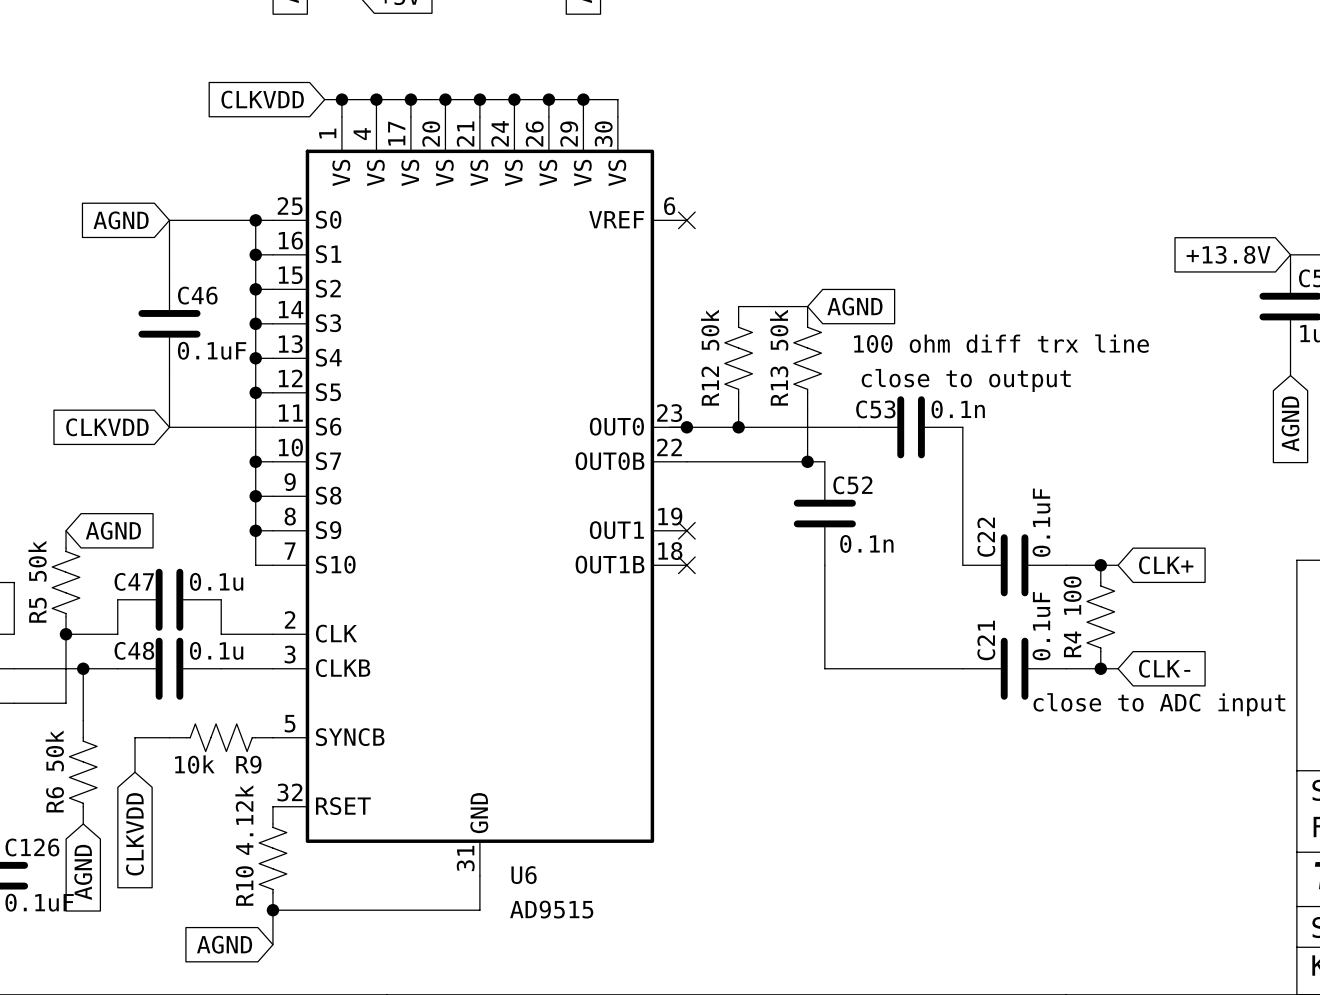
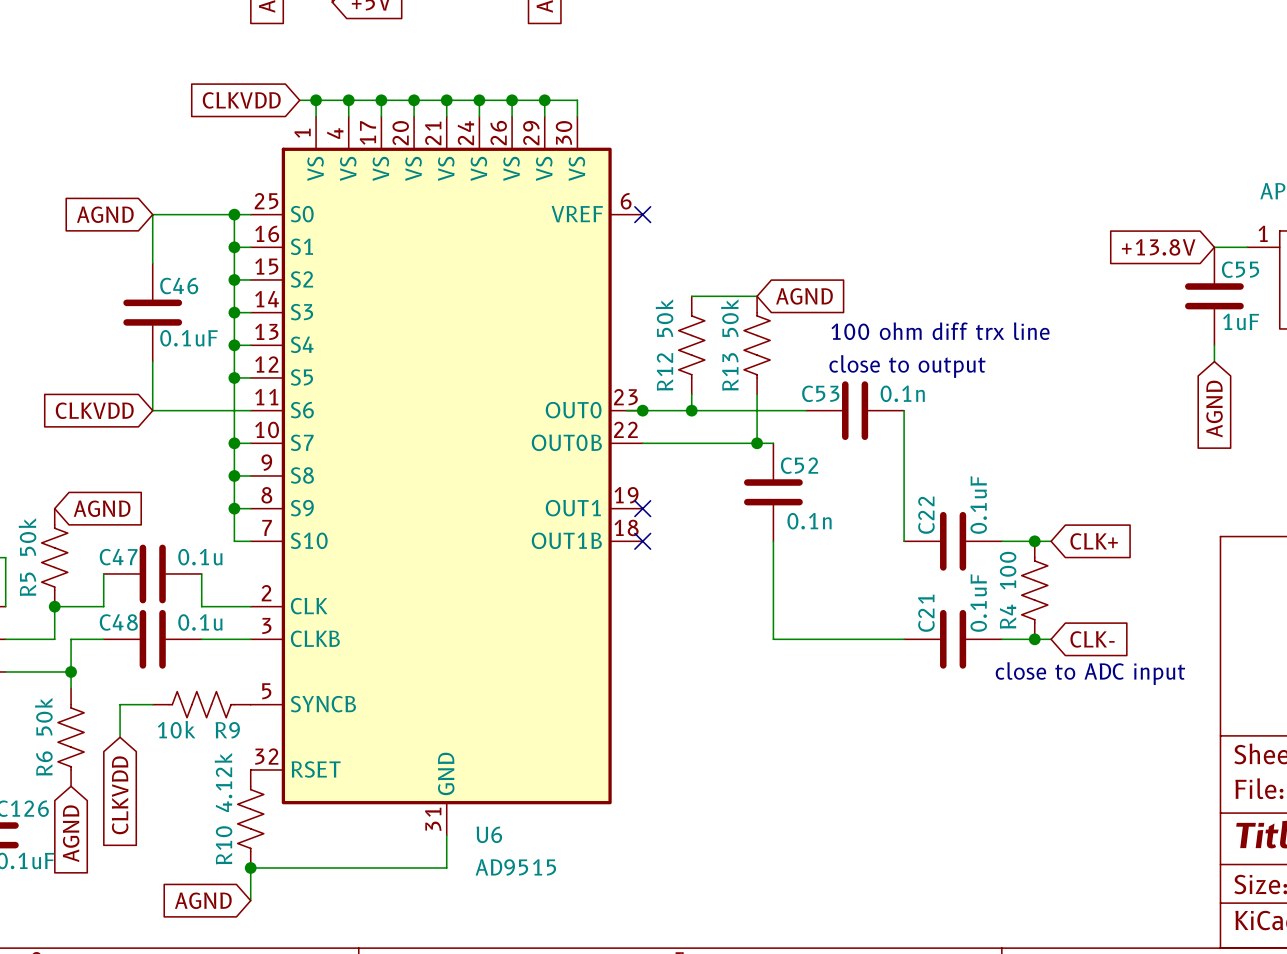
wire: (83, 668) (66, 668) (66, 703) -> (71, 671) (54, 671)
junction position: (83, 668) -> (71, 671)

